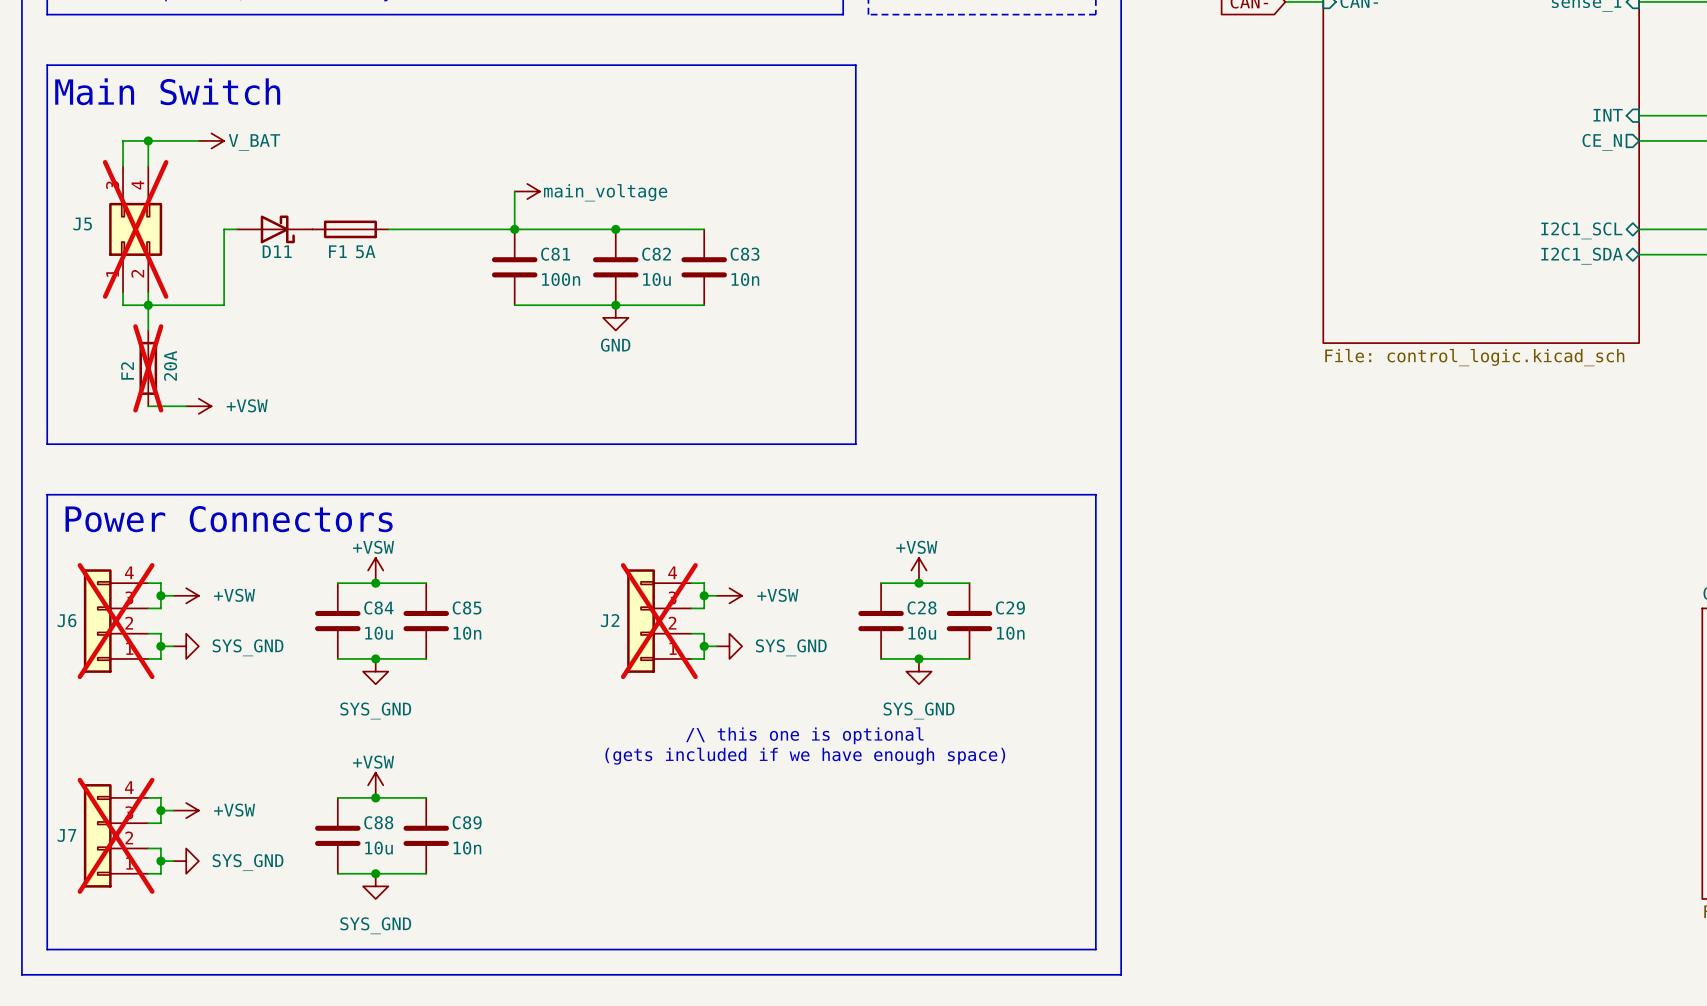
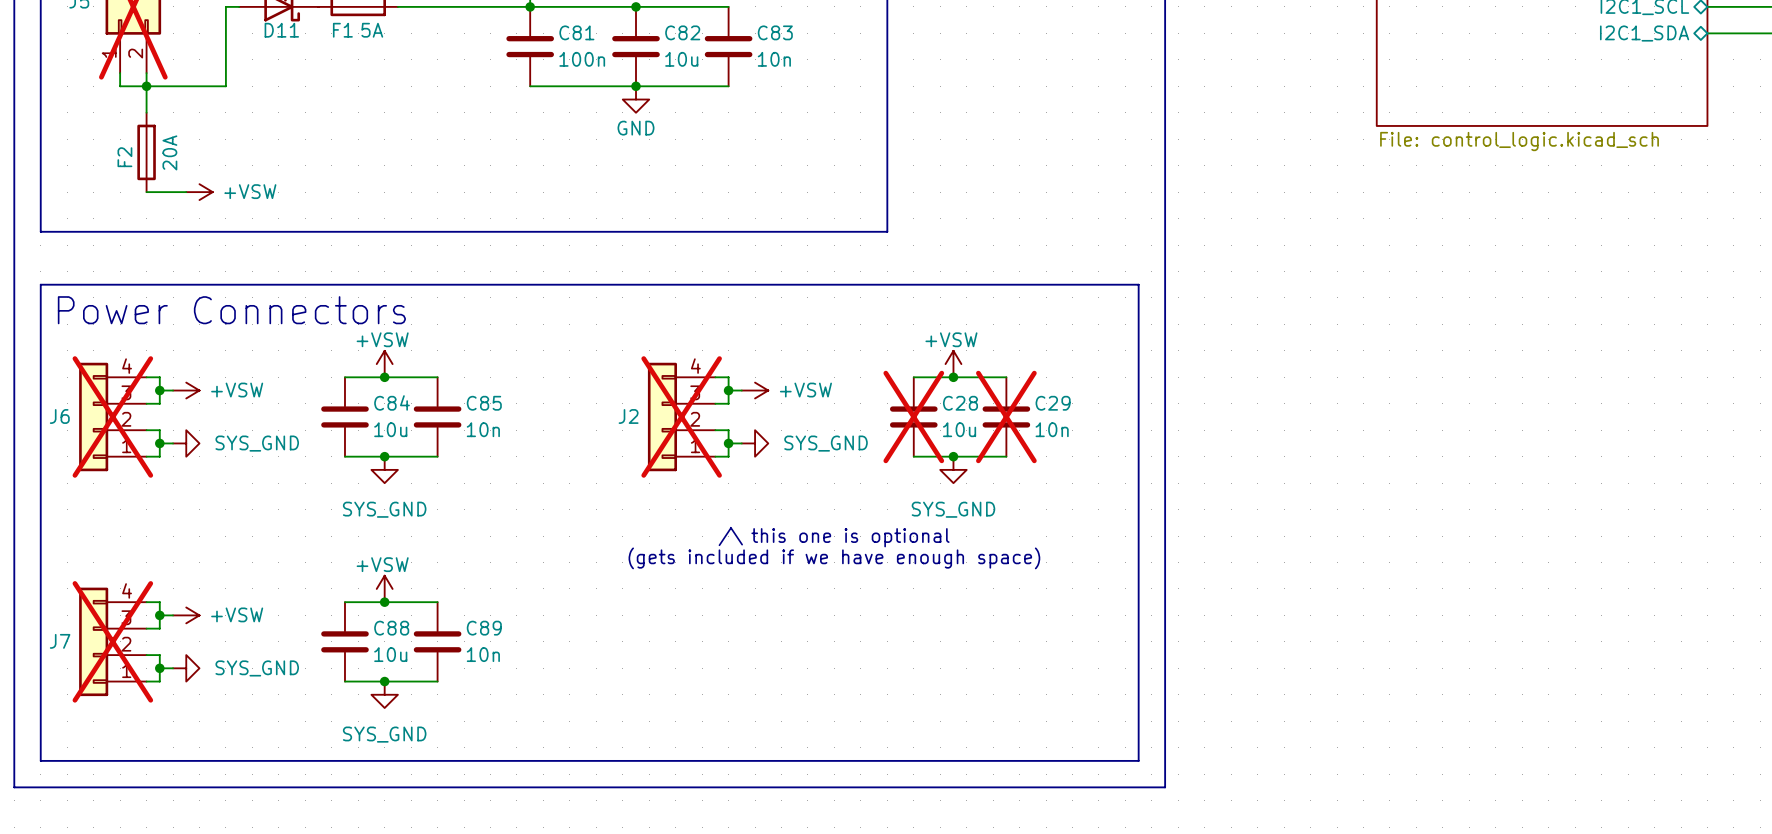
F2 do-not-place cross: (148, 368) -> none
C28 do-not-place cross: none -> (913, 416)
C29 do-not-place cross: none -> (1006, 416)

